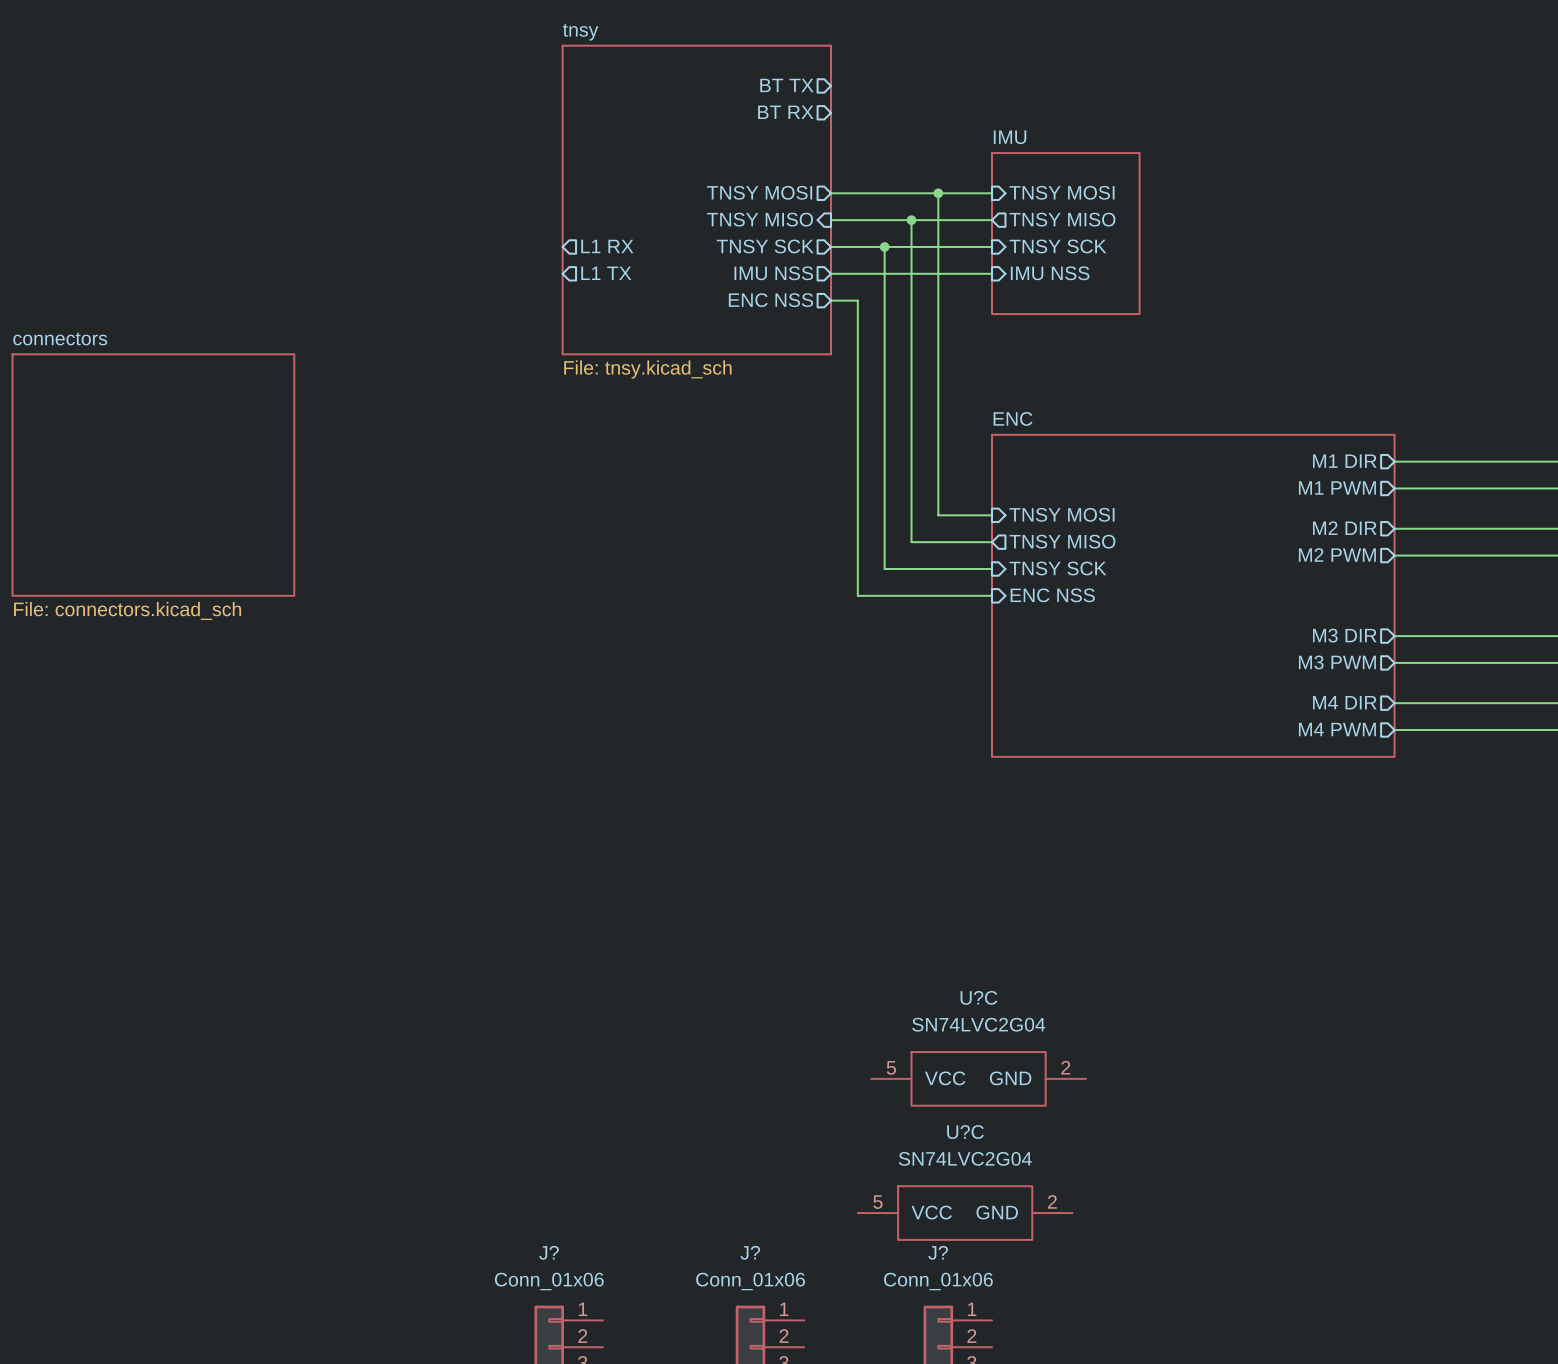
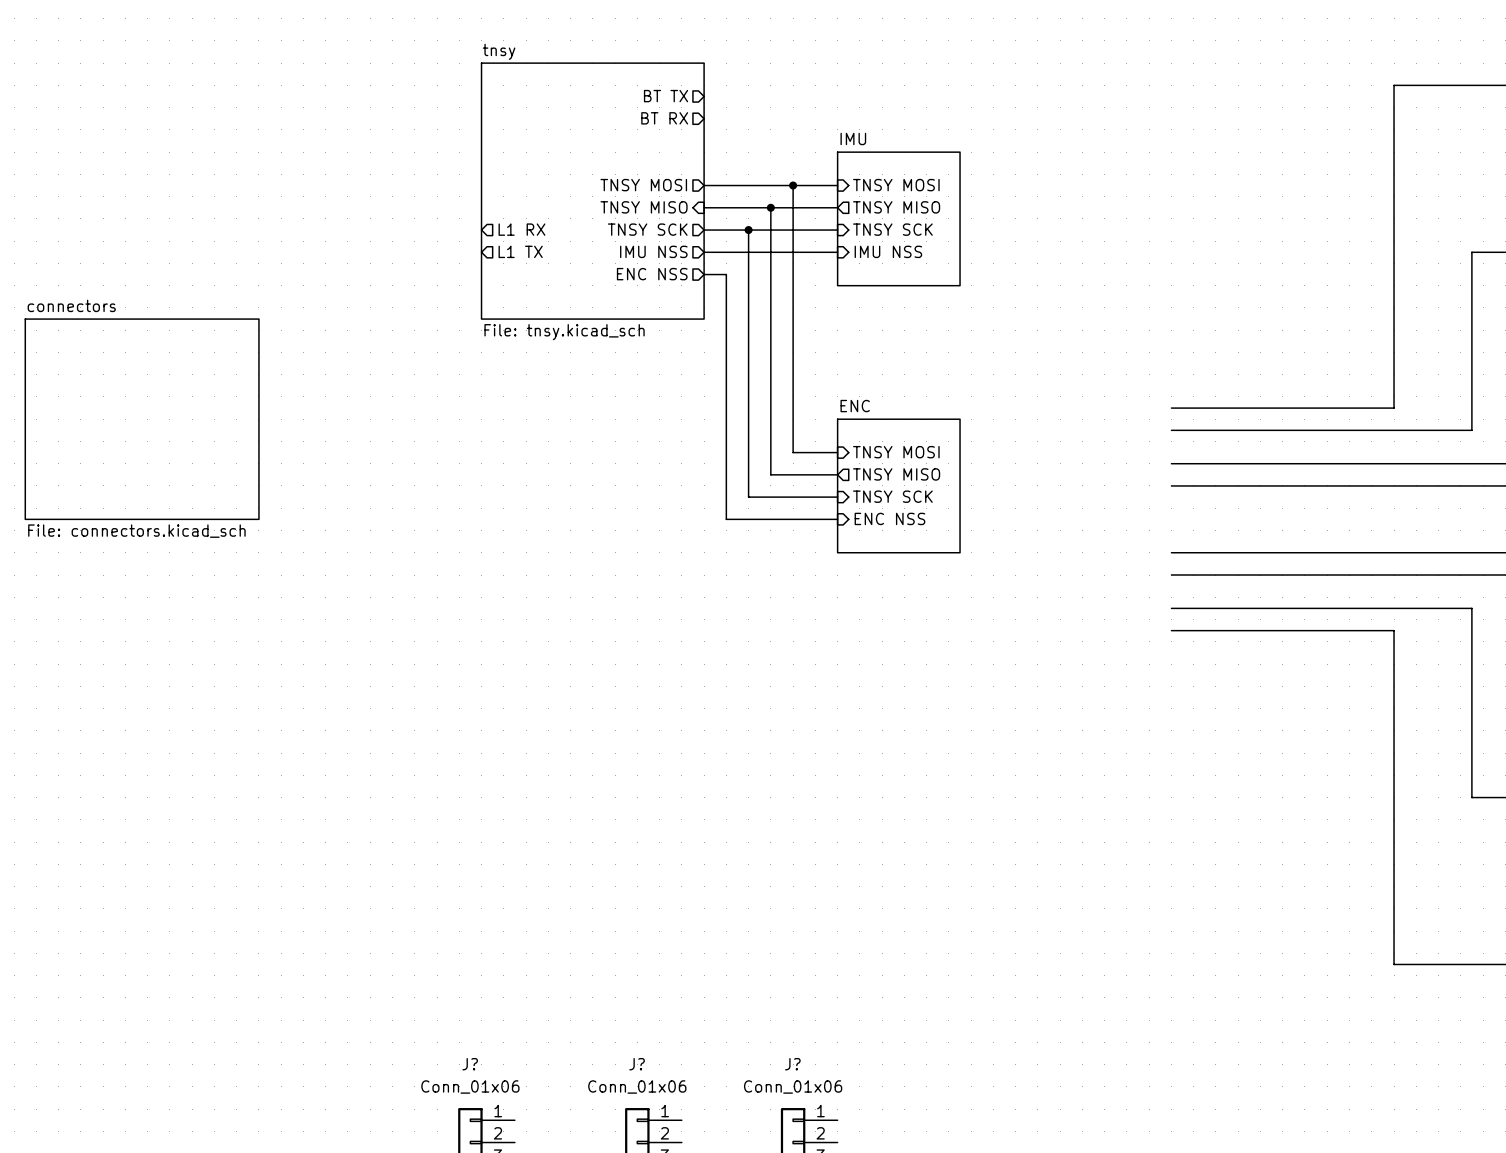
sheet pin: M1 DIR (1344, 461) -> none
sheet pin: M1 PWM (1337, 487) -> none
sheet pin: M2 DIR (1344, 528) -> none
sheet pin: M2 PWM (1337, 554) -> none
sheet ENC: none -> (898, 485)
sheet ENC: (1193, 595) -> none
sheet pin: M3 DIR (1344, 635) -> none
sheet pin: M3 PWM (1337, 662) -> none
sheet pin: M4 DIR (1344, 702) -> none
sheet pin: M4 PWM (1337, 729) -> none
U?C: SN74LVC2G04 (978, 1078) -> none
U?C: SN74LVC2G04 (965, 1213) -> none

